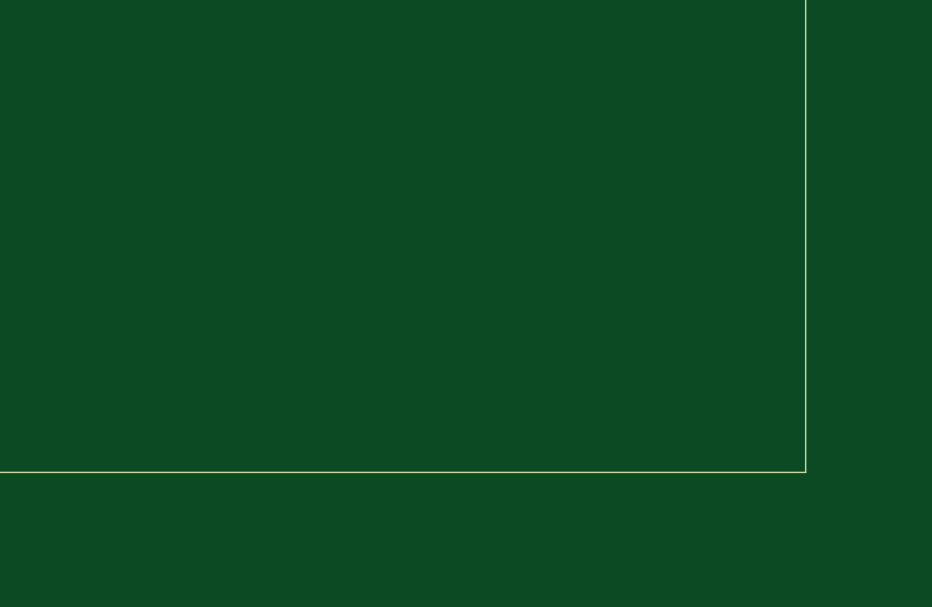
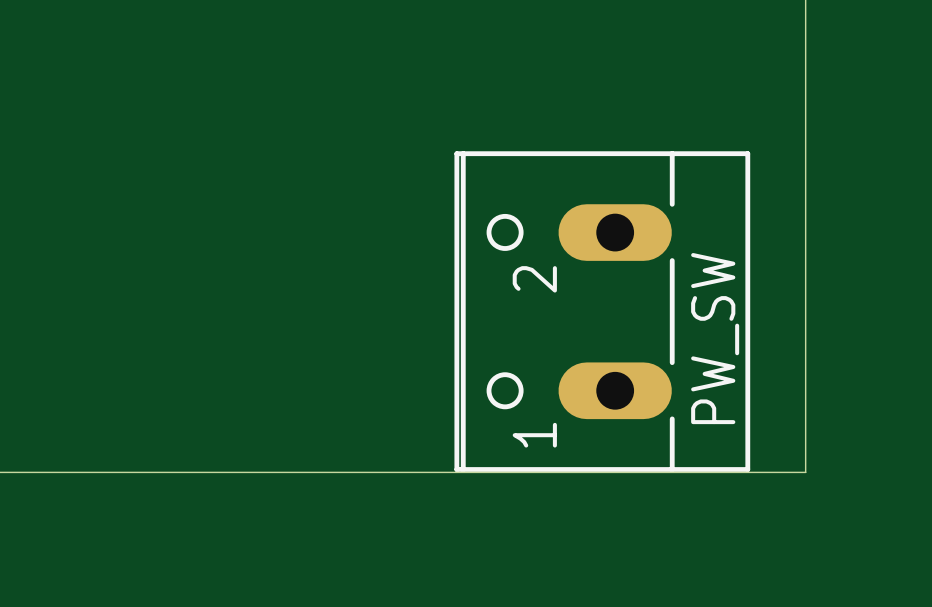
PW_SW: none -> (602, 311)

